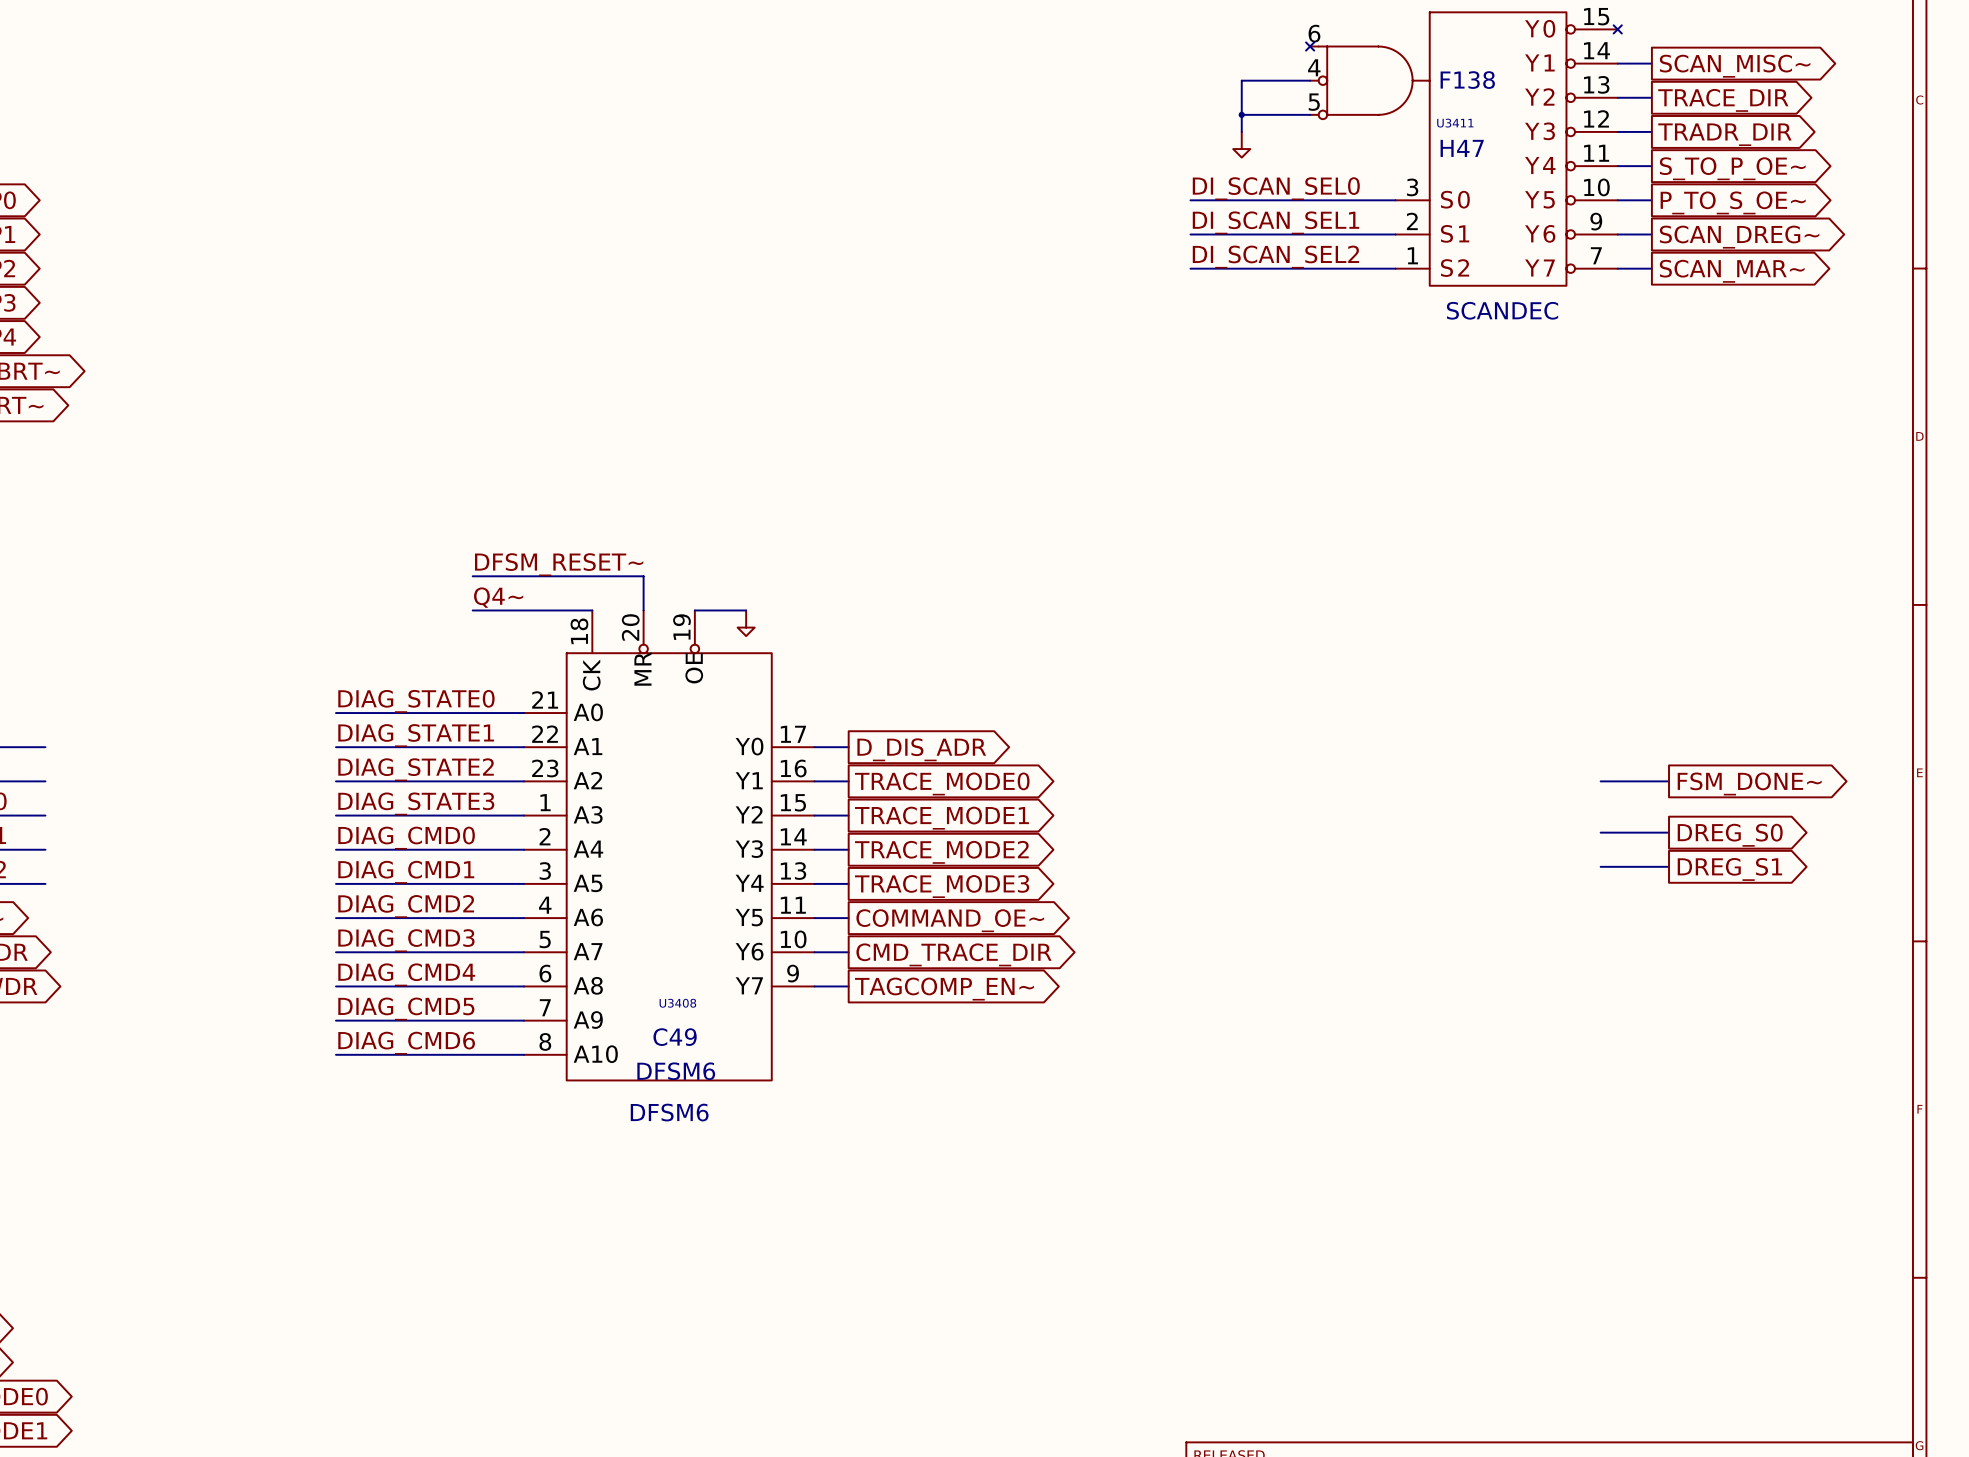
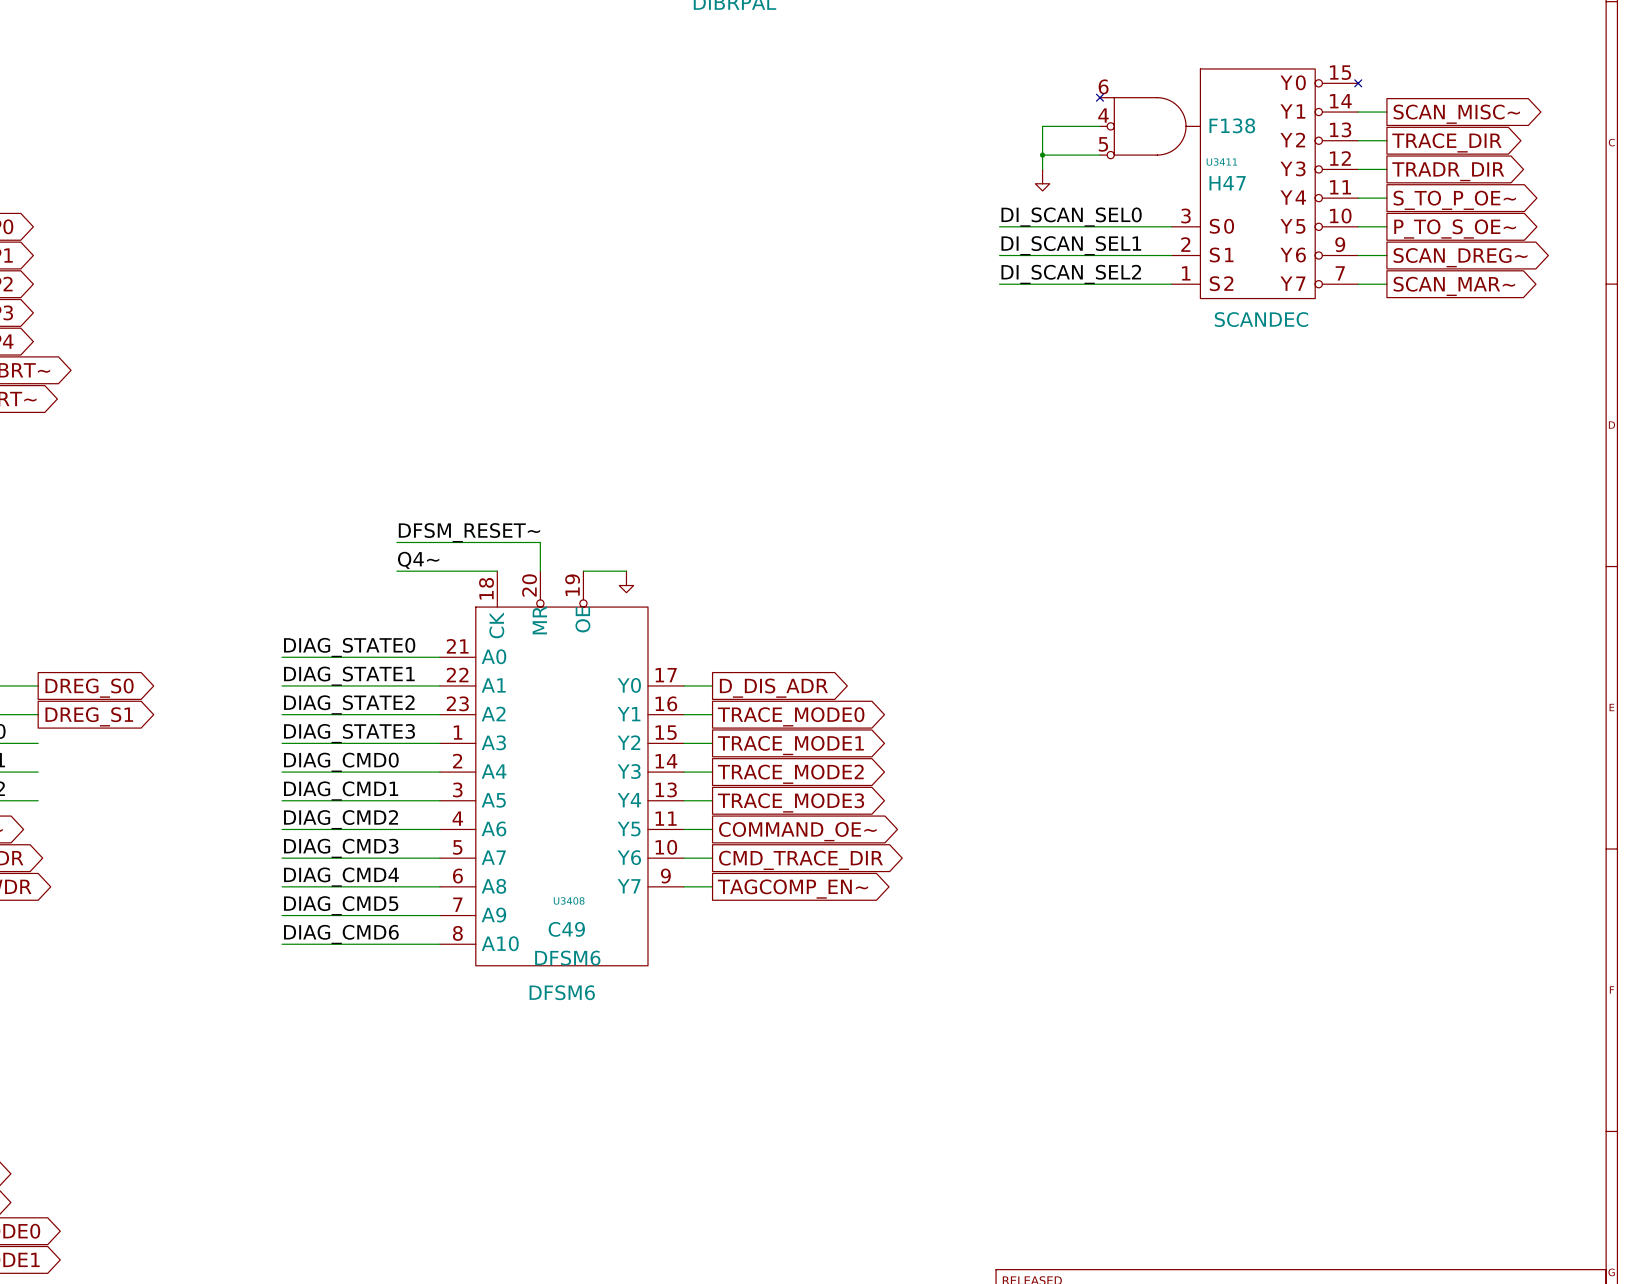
global label: none -> DREG_S0 (89, 688)
wire: (1600, 781) (1669, 781) -> none
global label: none -> DREG_S1 (89, 716)
global label: FSM_DONE~ (1749, 783) -> none
wire: (1600, 832) (1669, 832) -> none
global label: DREG_S0 (1730, 835) -> none
wire: (1600, 866) (1669, 866) -> none
global label: DREG_S1 (1729, 869) -> none

